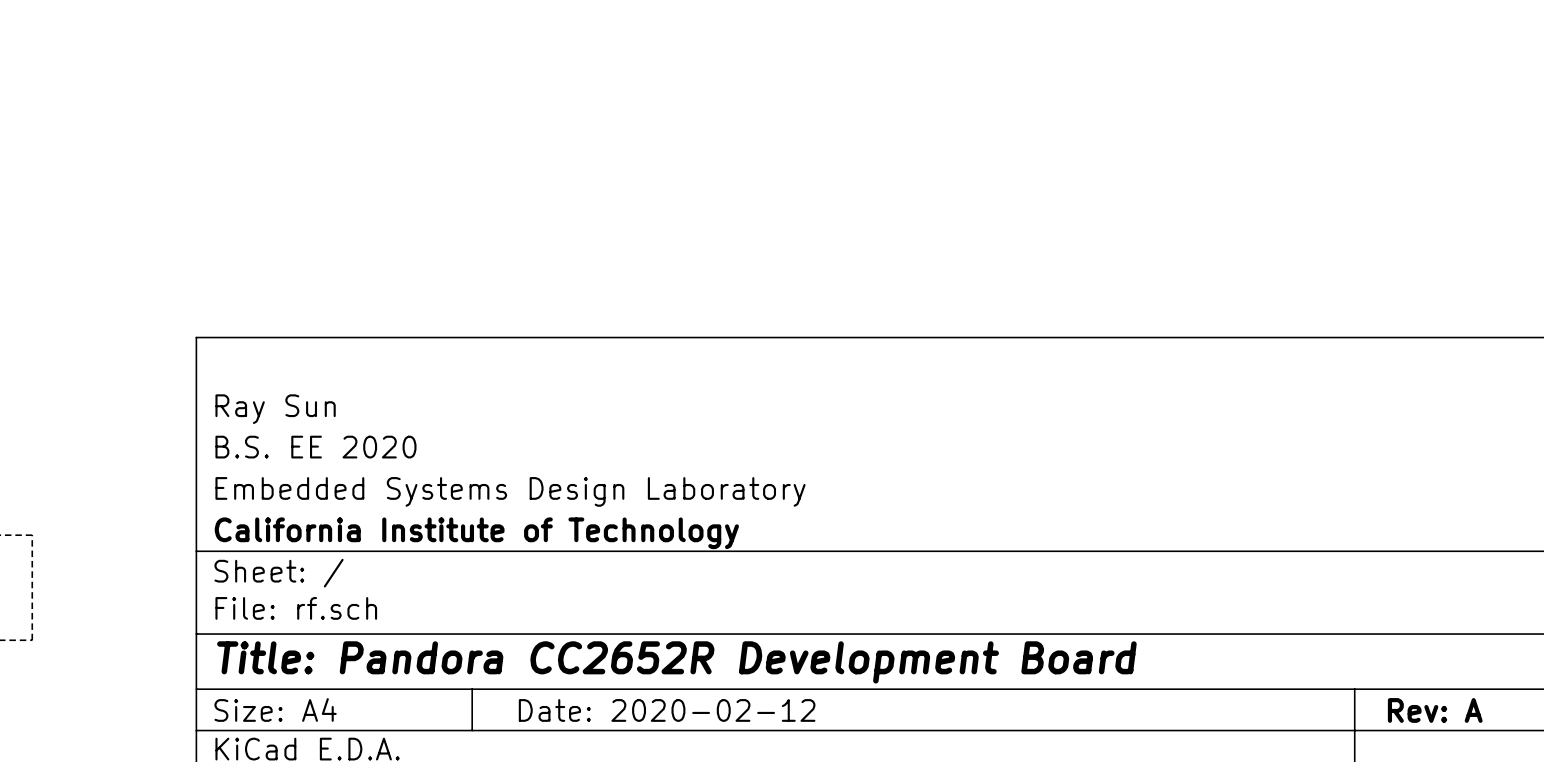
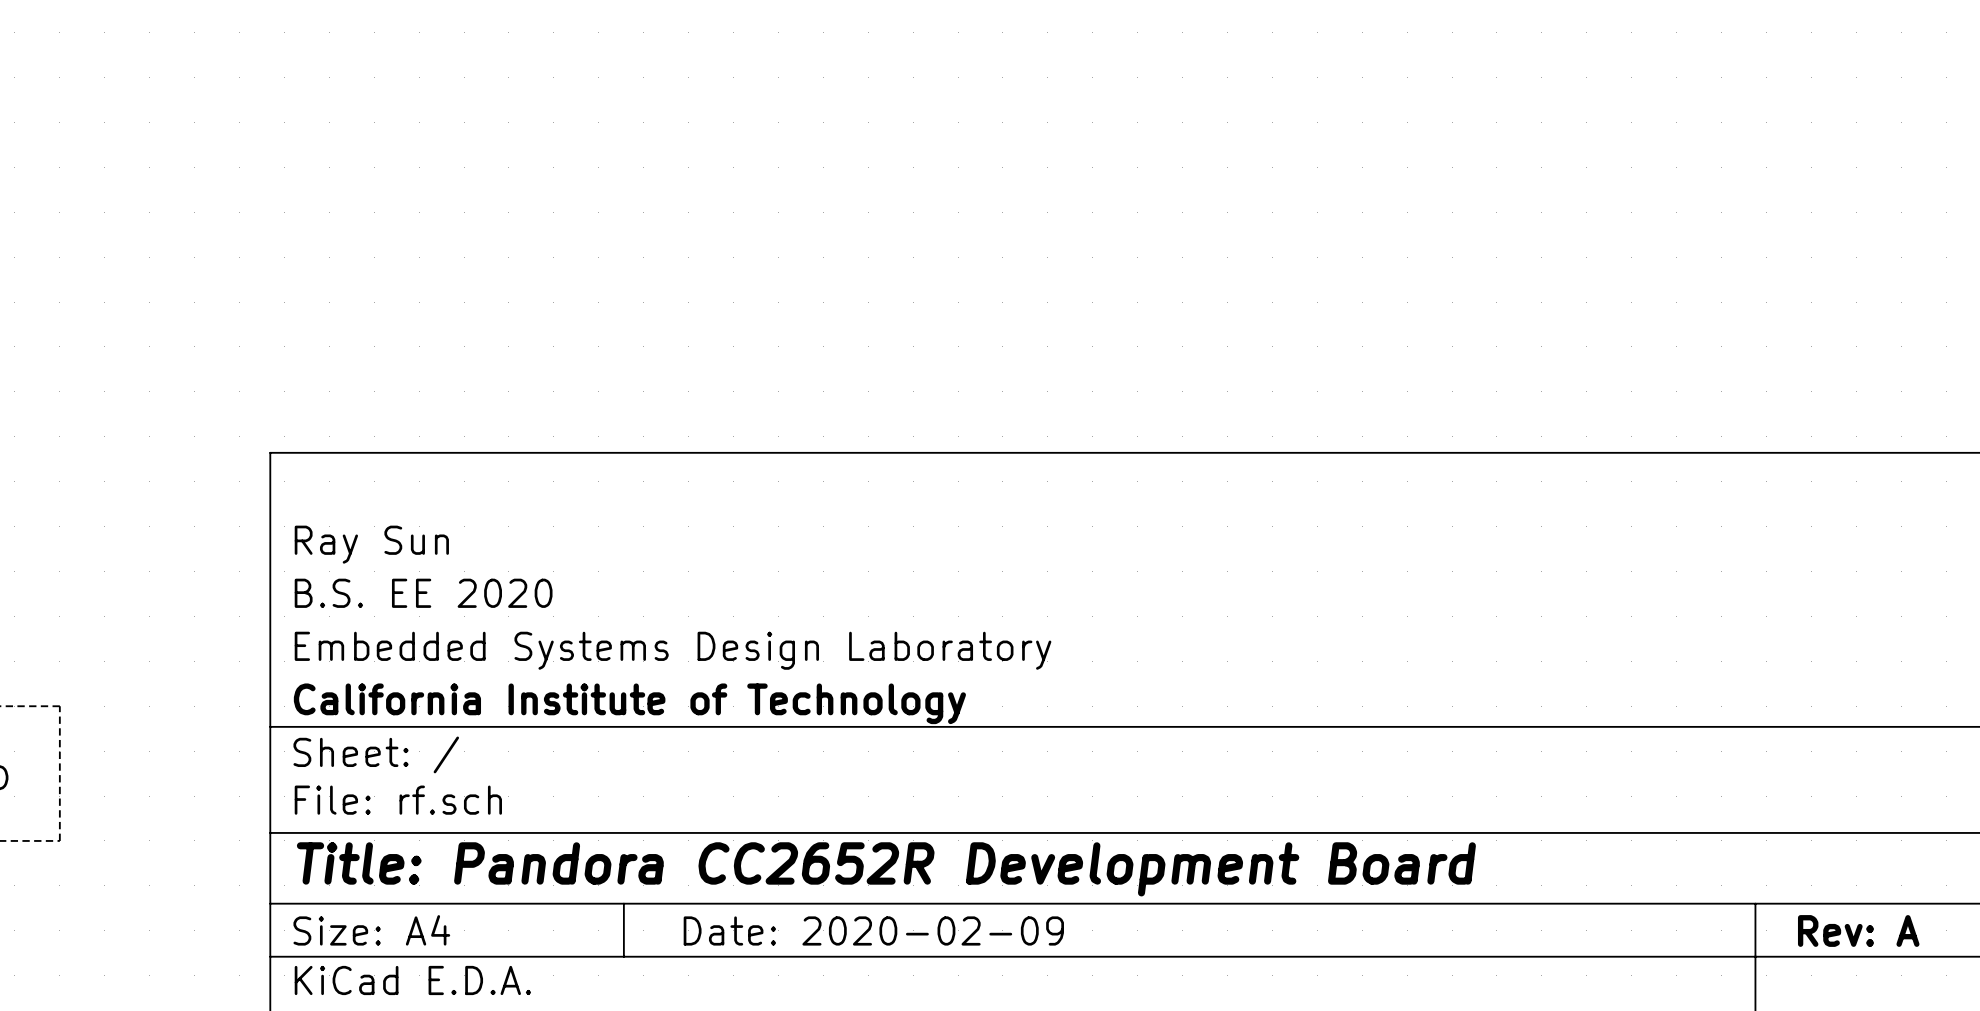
title block: Date: 2020-02-12 (667, 710) -> Date: 2020-02-09 (873, 930)

